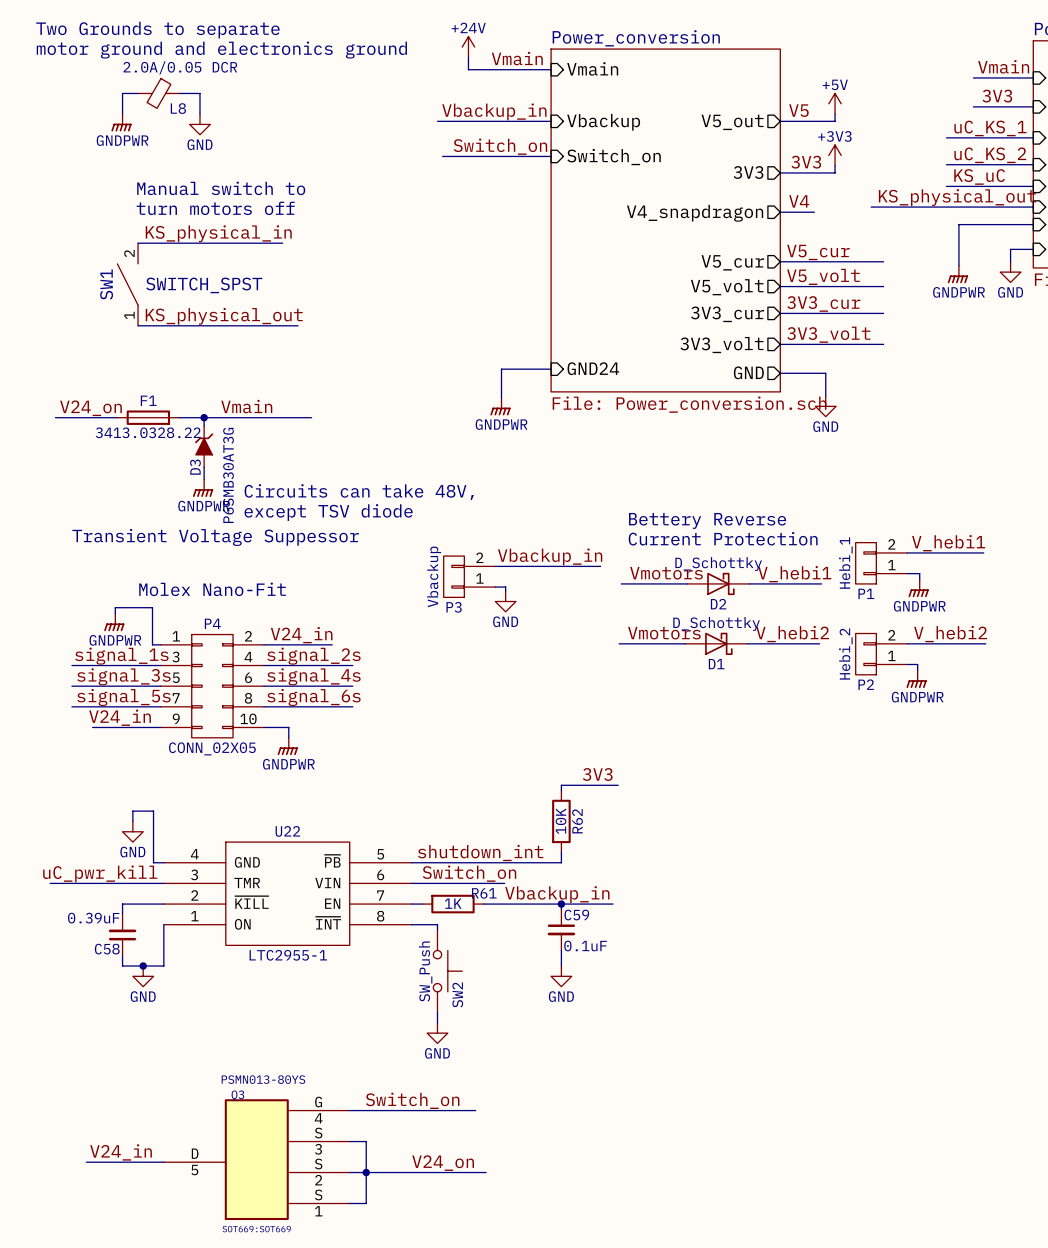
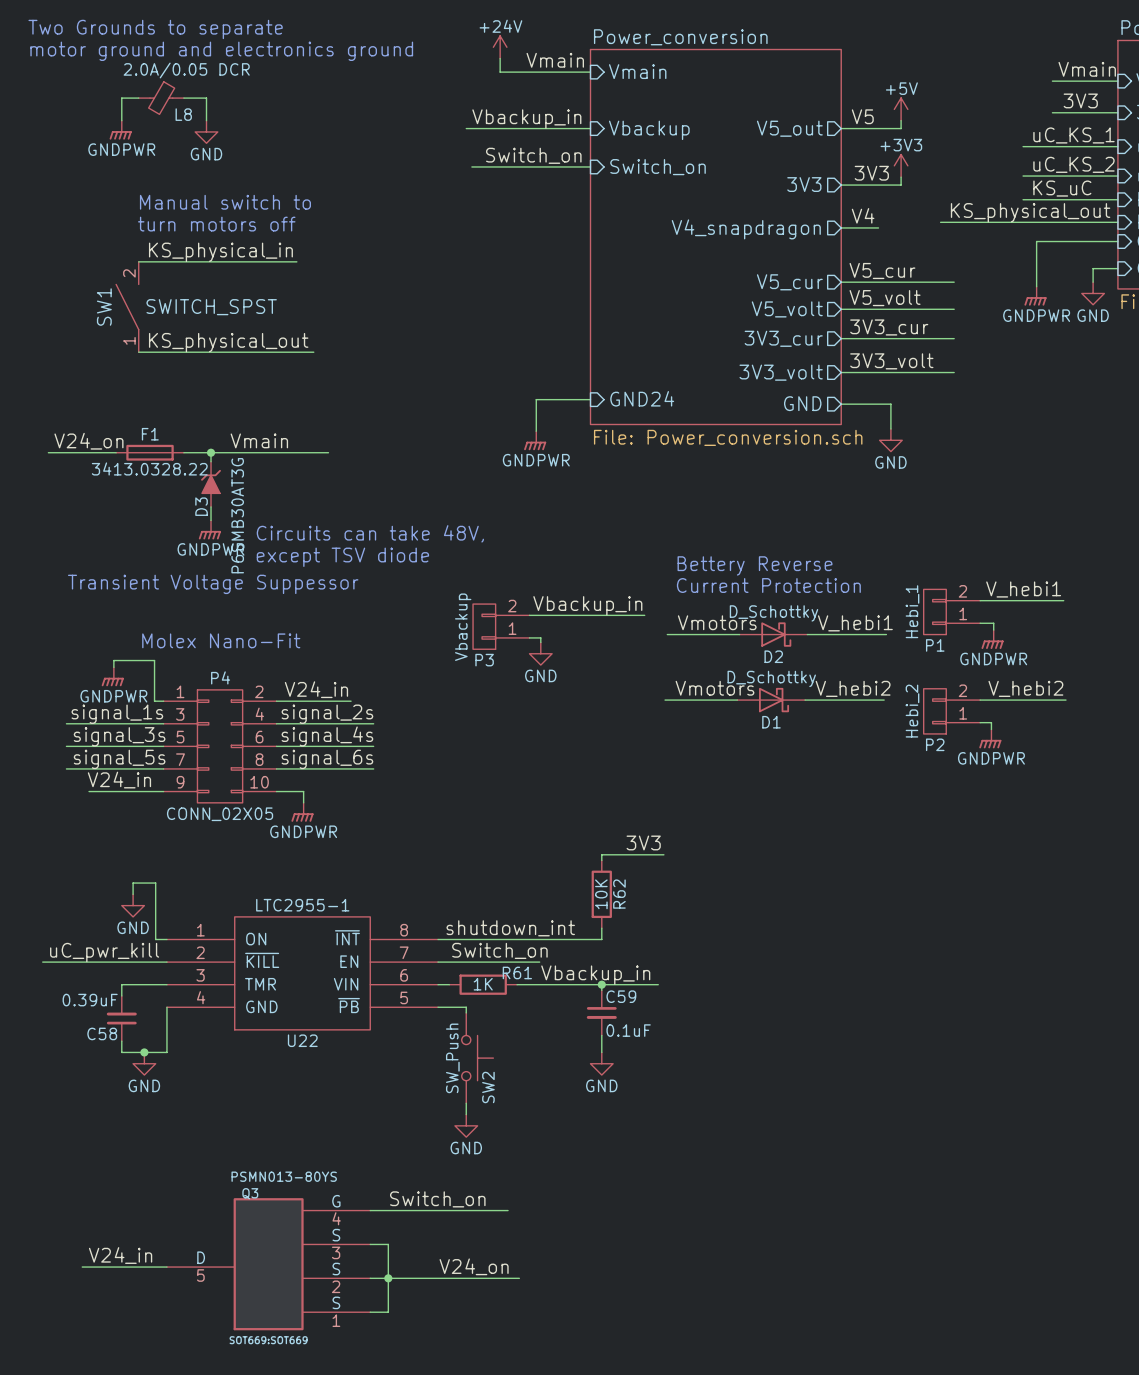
U22 flip: as is (287, 893) -> up-down (302, 973)

